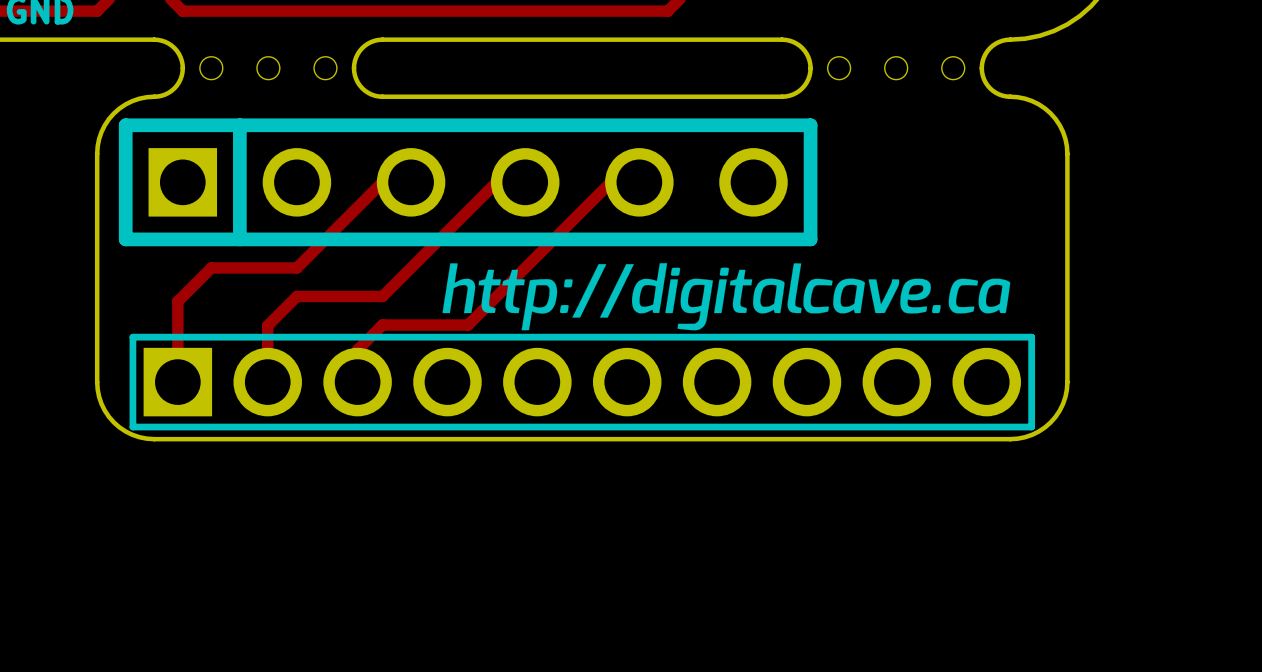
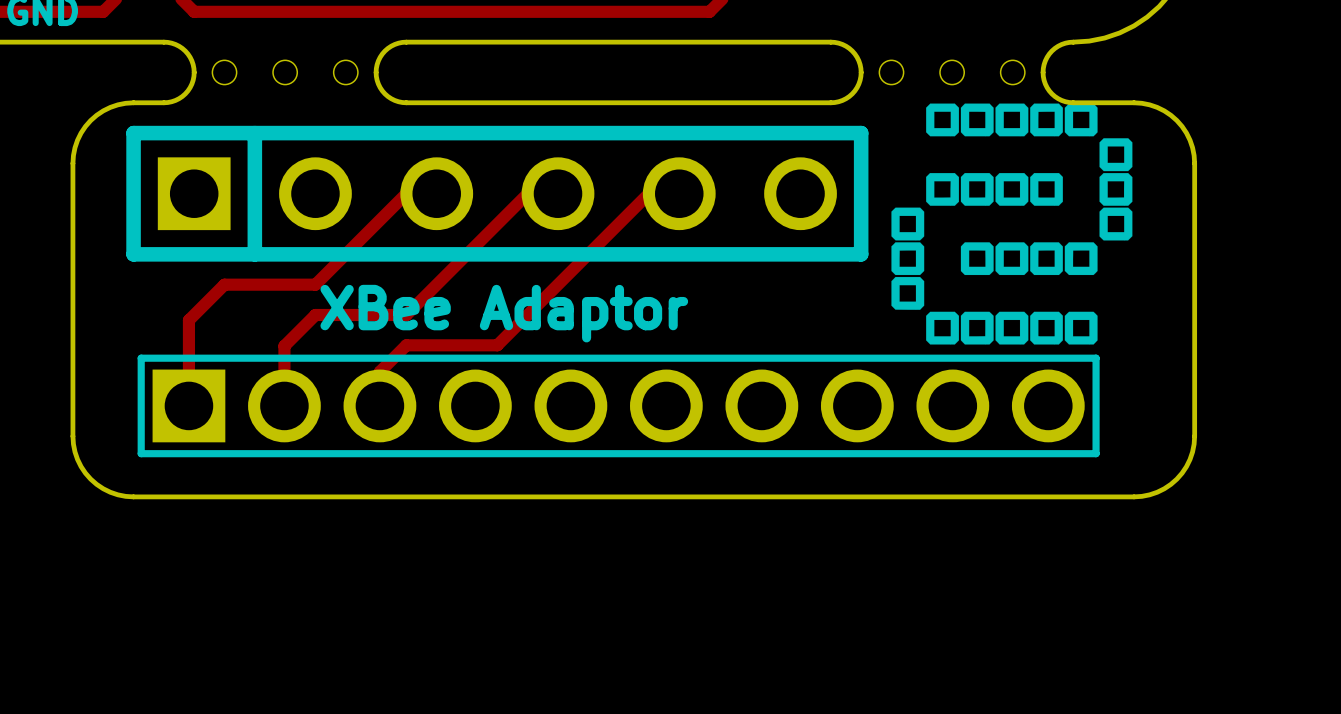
board edge: (981, 68) (985, 82) (996, 92) (1032, 101) (1050, 113) (1063, 131) (1066, 146) (1066, 389) (1059, 410) (1050, 422) (1032, 434) (1017, 438) (154, 439) (132, 434) (119, 427) (108, 416) (101, 403) (97, 389) (97, 153) (101, 131) (113, 113) (132, 101) (154, 96) -> (1043, 72) (1044, 80) (1049, 90) (1054, 96) (1065, 101) (1141, 103) (1164, 110) (1182, 126) (1192, 147) (1194, 163) (1194, 444) (1190, 459) (1182, 473) (1164, 488) (1149, 494) (1134, 496) (133, 496) (110, 492) (96, 484) (85, 473) (77, 459) (73, 444) (73, 155) (81, 133) (90, 120) (103, 110) (125, 103) (163, 102)
drawing: none -> [891, 103, 1133, 345]
drawing: [442, 263, 1011, 331] -> none
text: none -> XBee Adaptor (504, 313)

